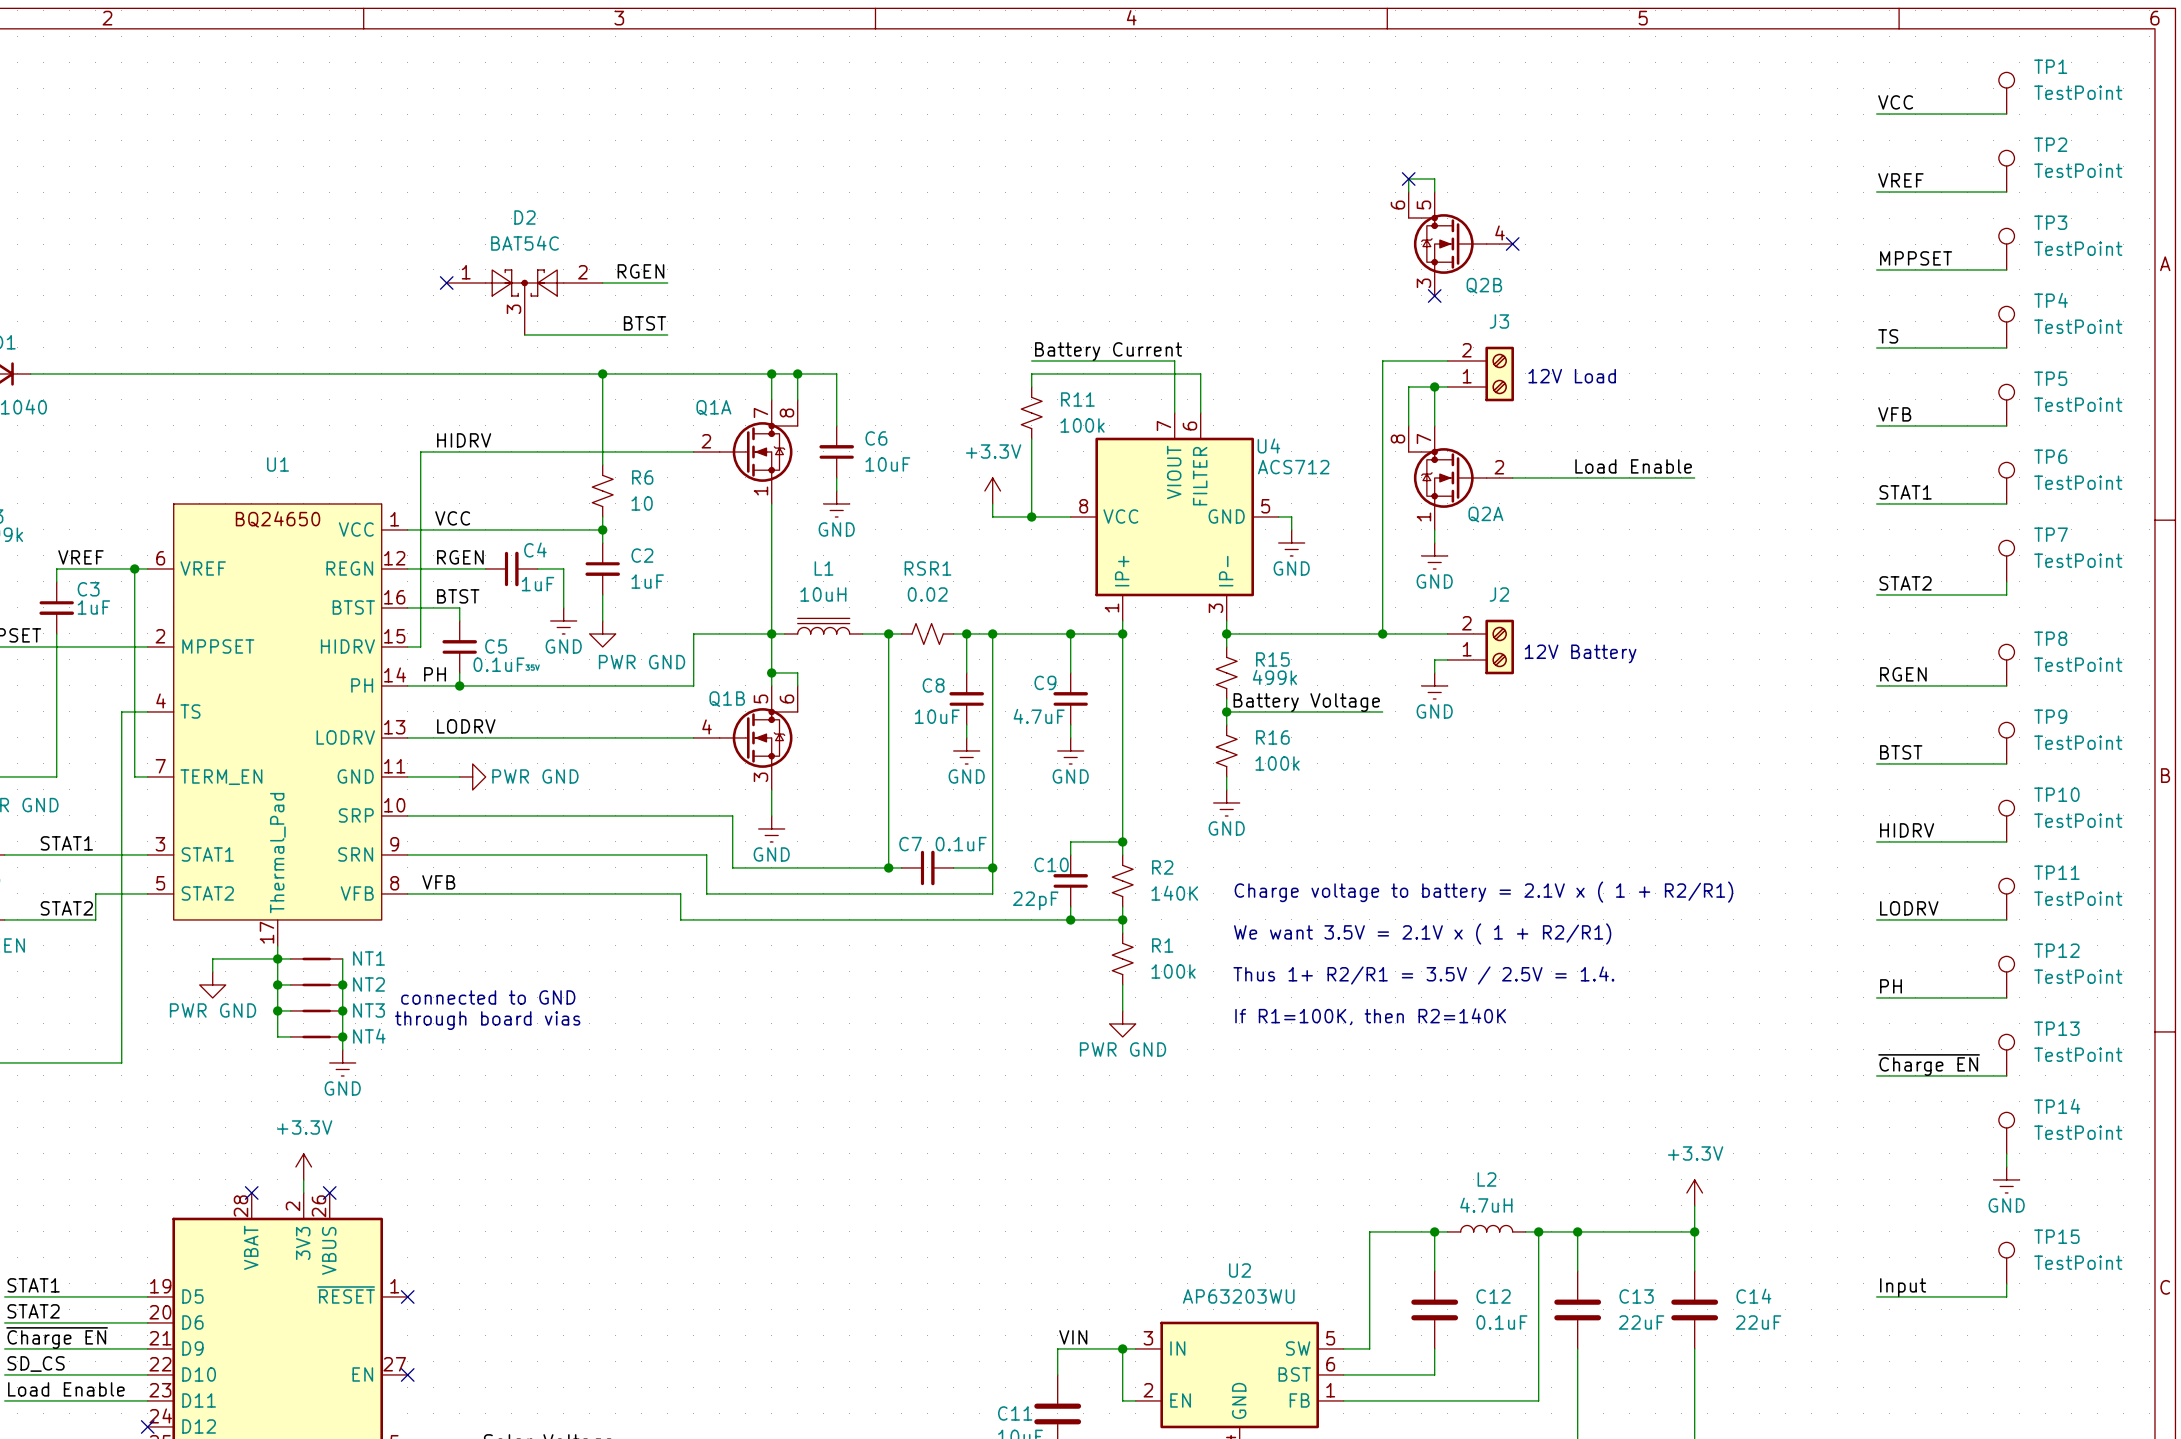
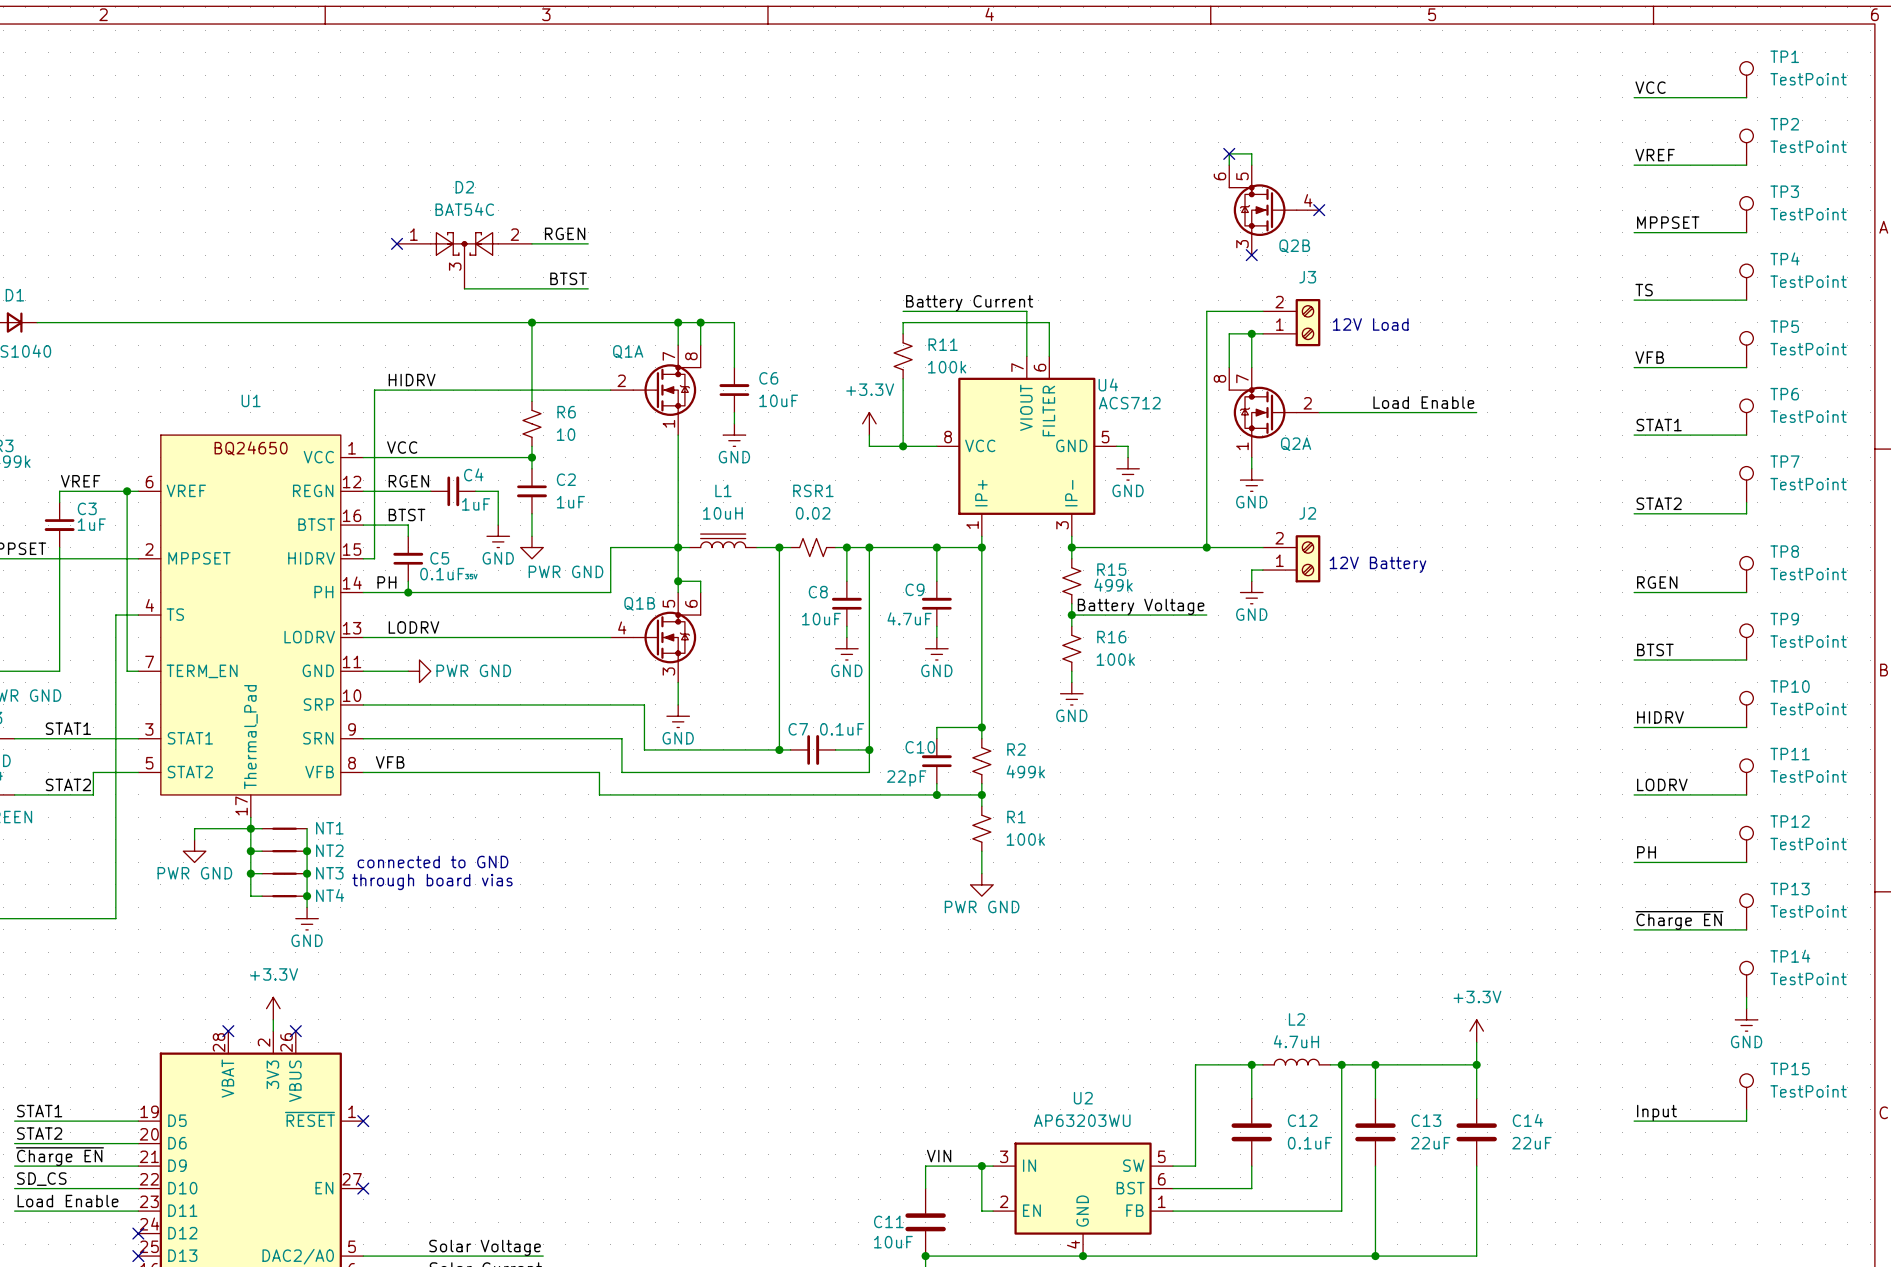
text: Charge voltage to battery = 2.1V x ( 1 + R2/R1) (1483, 892) -> none
R2 value: 140K (1174, 893) -> 499k (1025, 771)
text: We want 3.5V = 2.1V x ( 1 + R2/R1) (1422, 933) -> none
text: Thus 1+ R2/R1 = 3.5V / 2.5V = 1.4. (1423, 975) -> none
text: If R1=100K, then R2=140K (1370, 1016) -> none

